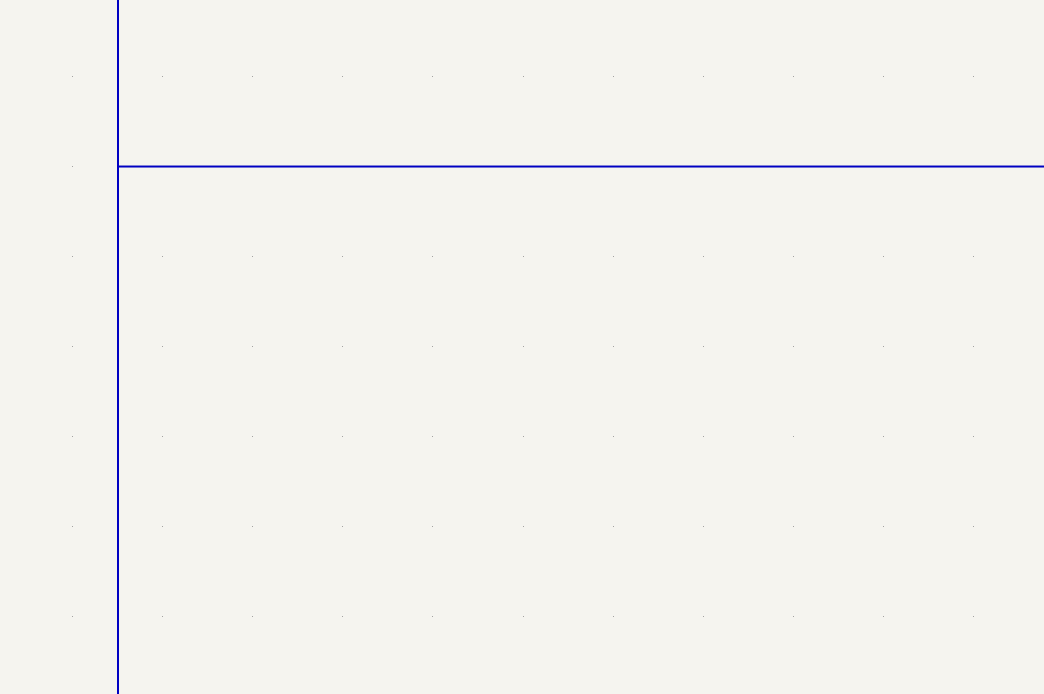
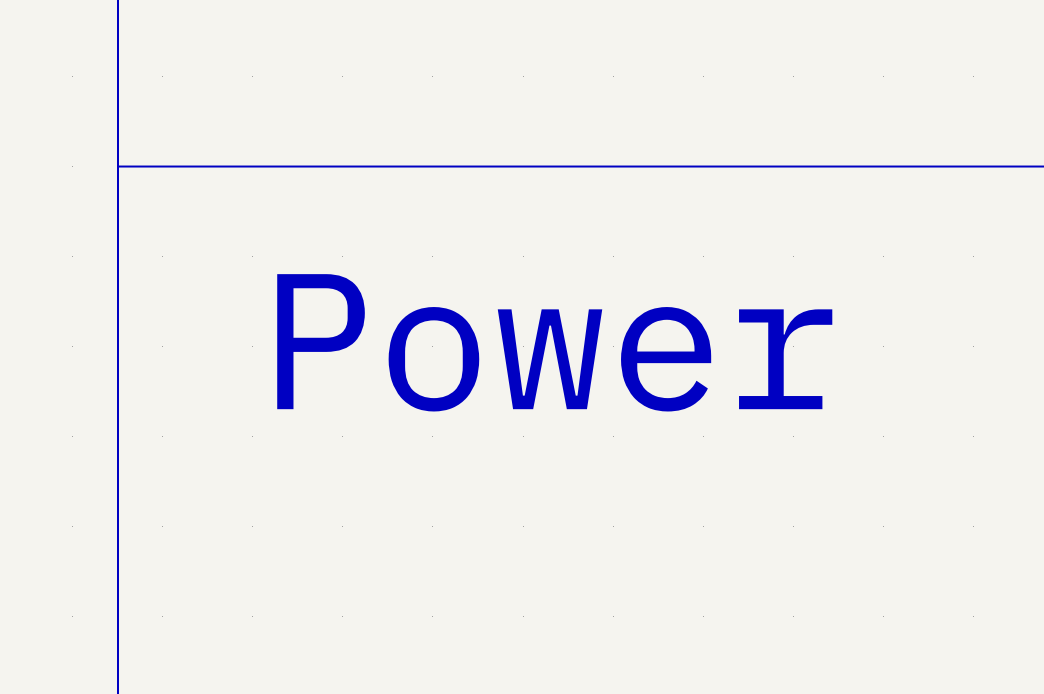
text: none -> Power (554, 342)

